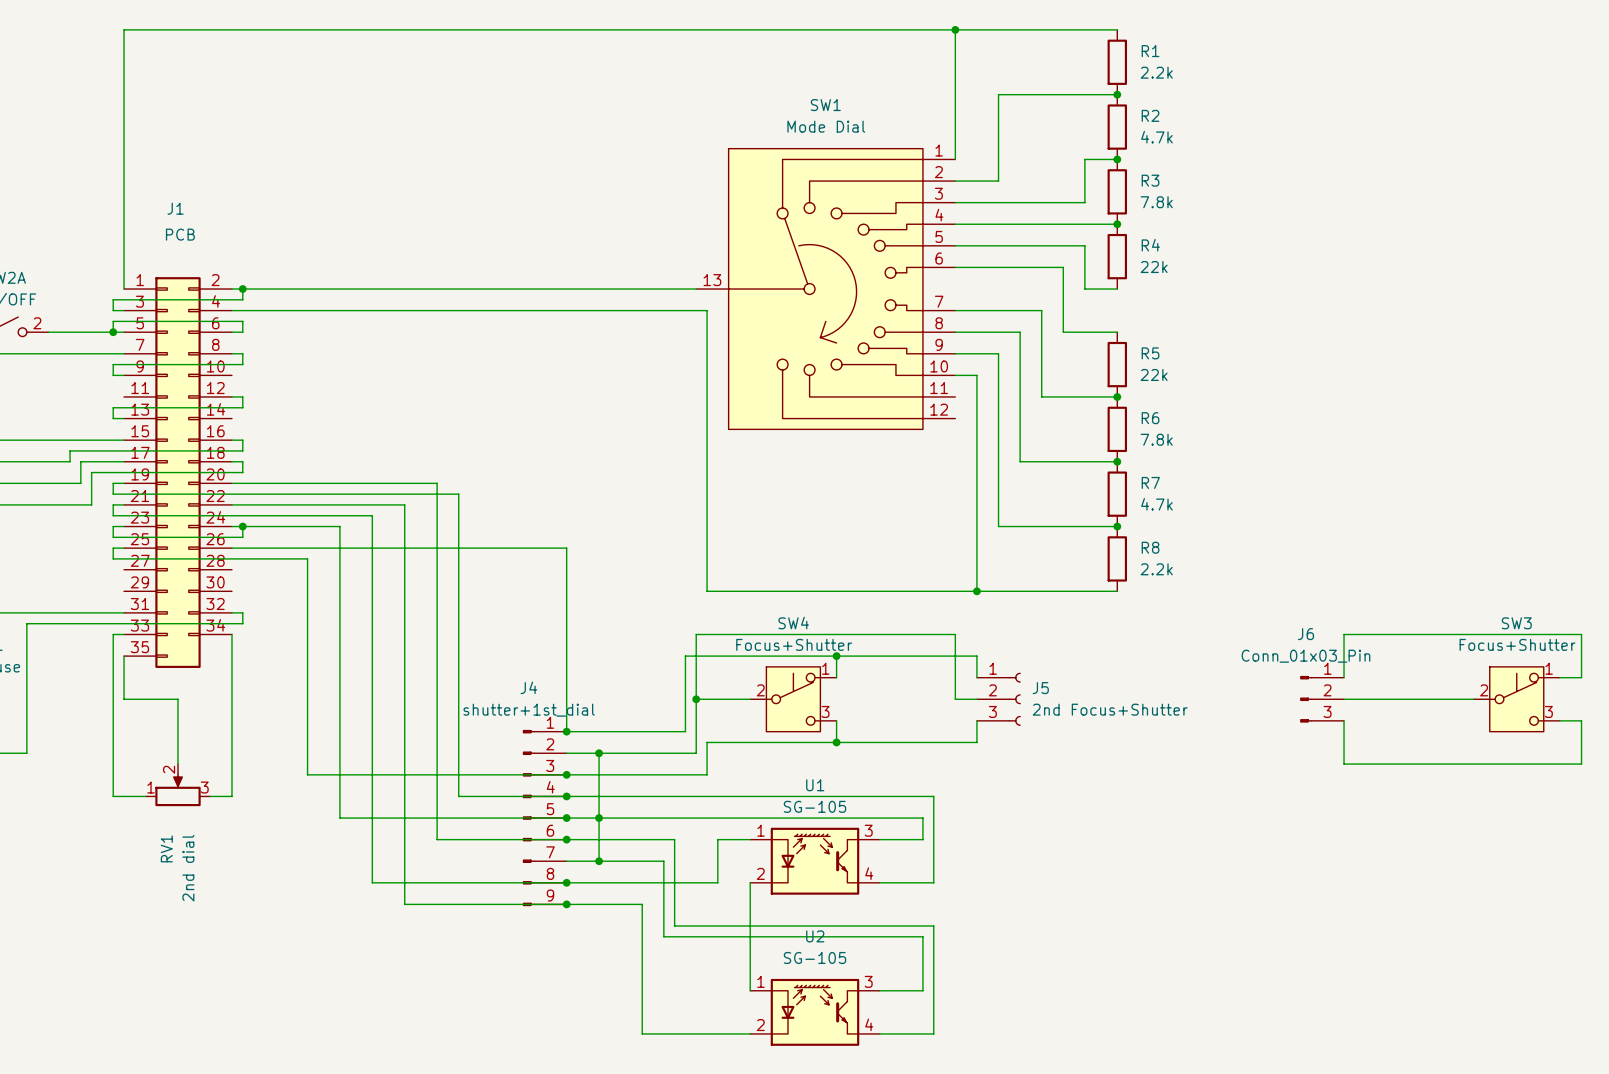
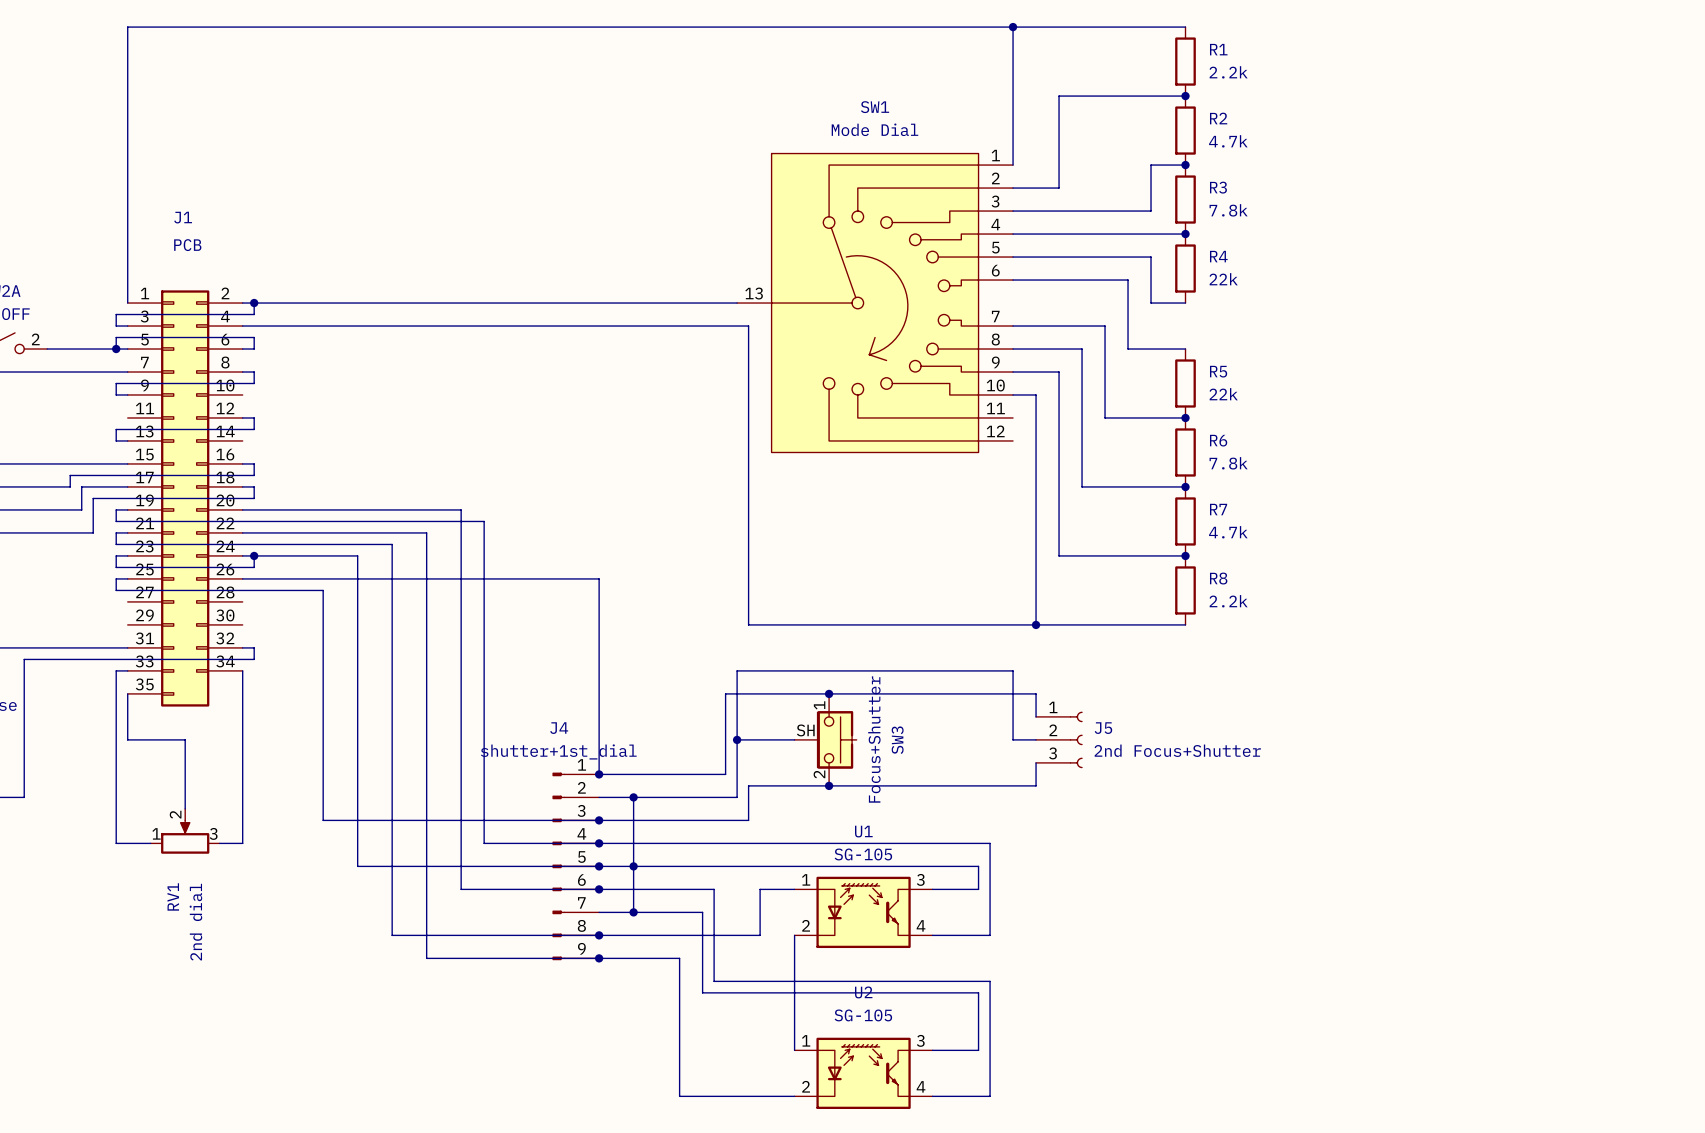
SW3 name position: SW3 (1516, 623) -> SW3 (897, 740)
SW3 value position: Focus+Shutter (1517, 644) -> Focus+Shutter (874, 739)
junction: none -> (829, 693)
wire: (836, 656) (836, 677) -> none
junction: (836, 656) -> none
SW3 symbol: [1473, 666, 1560, 732] -> [794, 693, 857, 786]
wire: (1344, 677) (1344, 634) (1581, 634) (1581, 677) (1559, 677) -> none
SW4: Focus+Shutter (793, 699) -> none
J6: Conn_01x03_Pin (1322, 699) -> none
wire: (1344, 699) (1473, 699) -> none
wire: (836, 720) (836, 742) -> none
wire: (1344, 720) (1344, 764) (1581, 764) (1581, 720) (1559, 720) -> none
junction: none -> (829, 785)
junction: (836, 742) -> none

